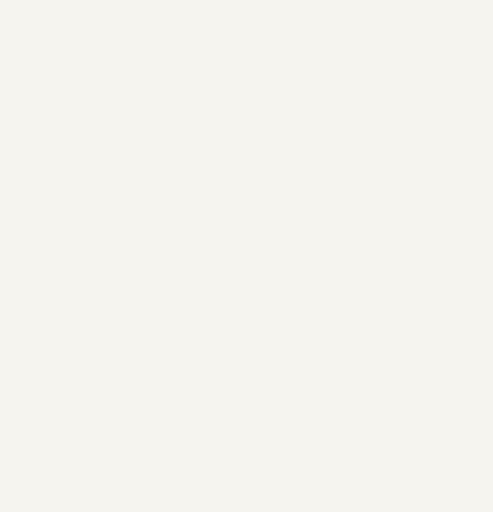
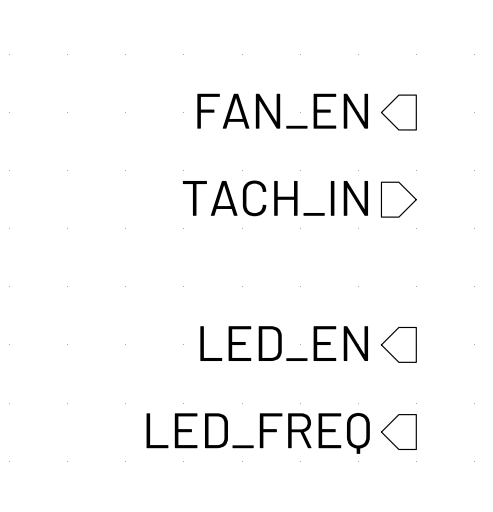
hierarchical label: none -> FAN_EN (282, 111)
hierarchical label: none -> TACH_IN (275, 198)
hierarchical label: none -> LED_EN (284, 343)
hierarchical label: none -> LED_FREQ (258, 433)

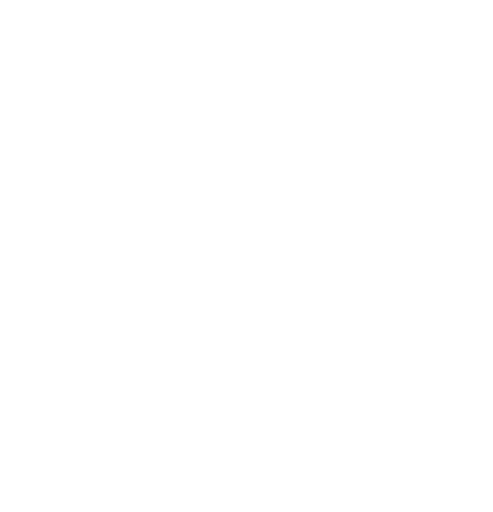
hierarchical label: FAN_EN (282, 111) -> none
hierarchical label: TACH_IN (275, 198) -> none
hierarchical label: LED_EN (284, 343) -> none
hierarchical label: LED_FREQ (258, 433) -> none

